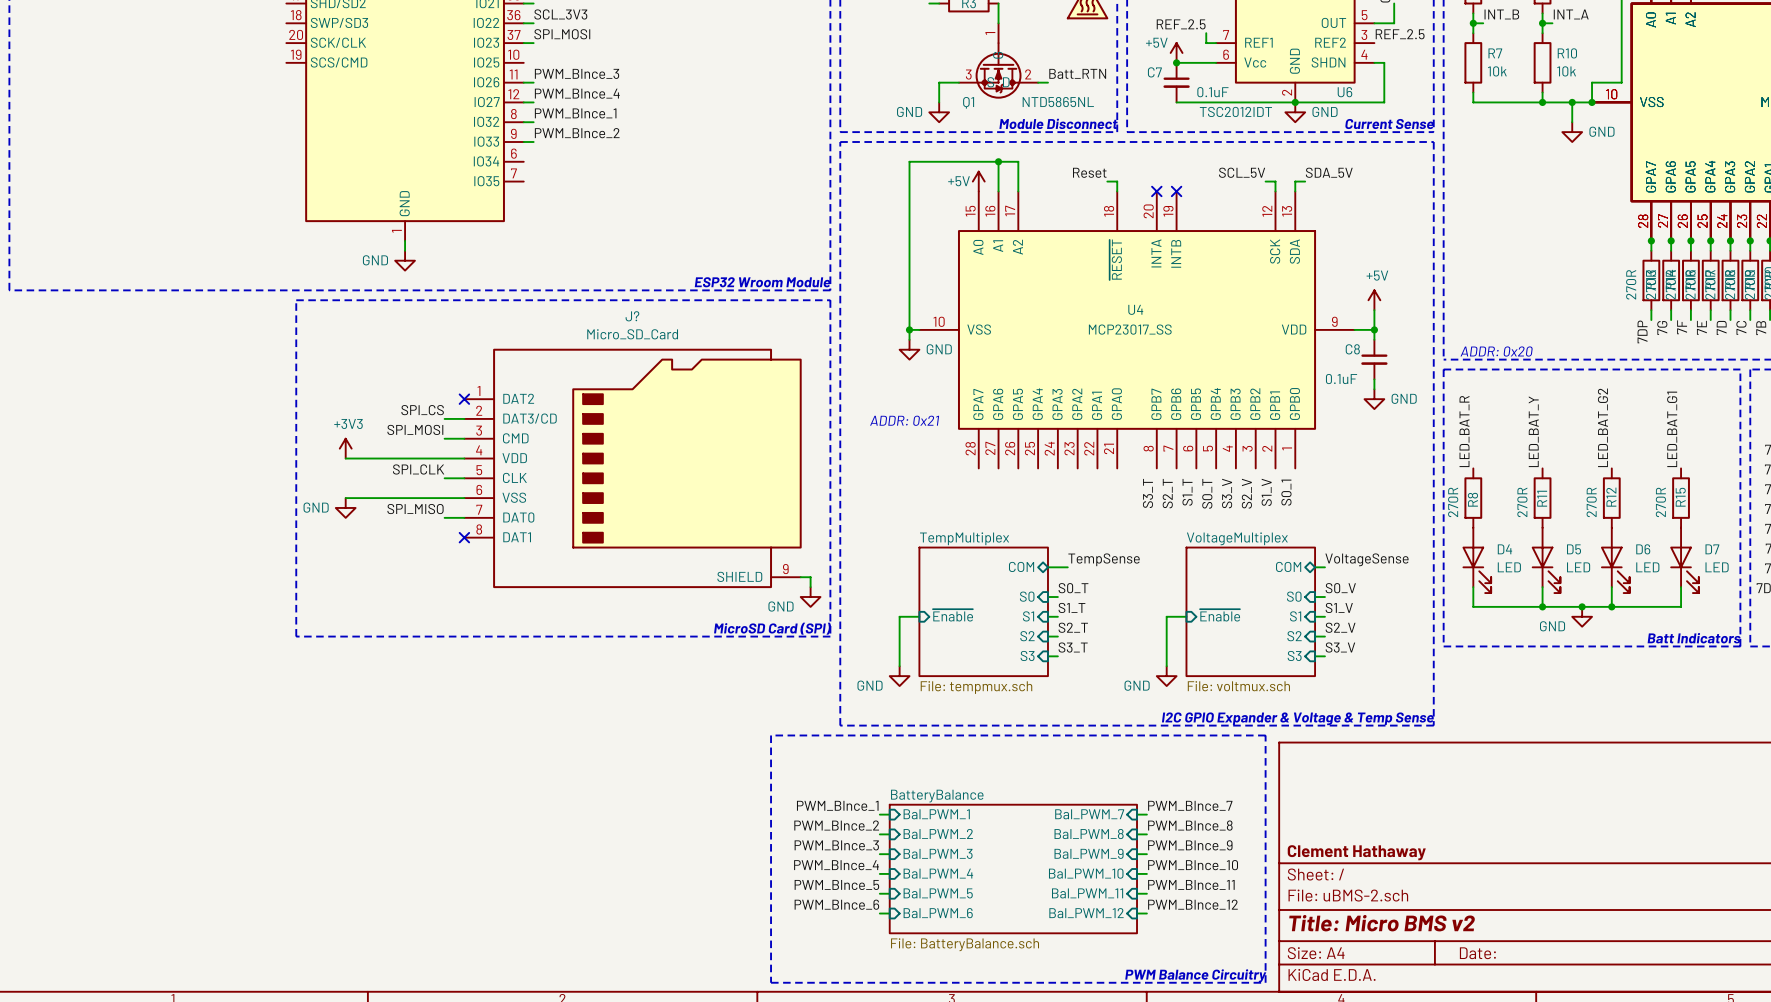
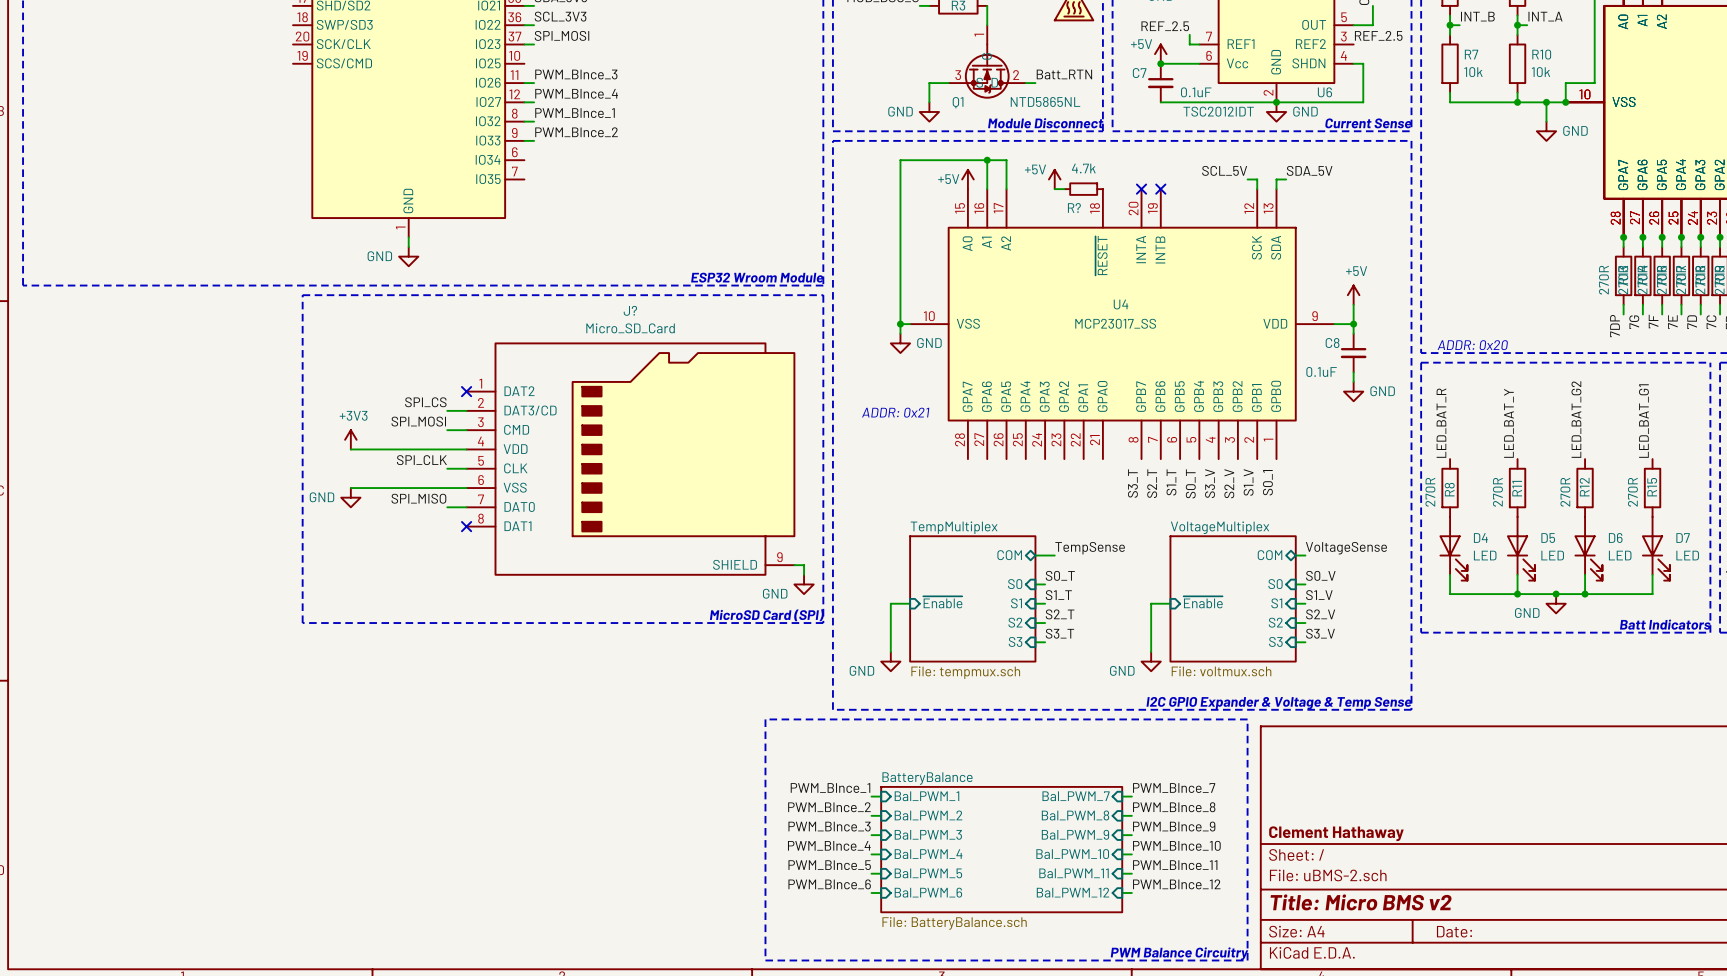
label: Reset (1089, 172) -> none
power symbol: none -> +5V (1054, 179)
wire: (1107, 181) (1117, 181) (1117, 191) -> none
wire: none -> (1054, 189) (1064, 189)
R?: none -> 4.7k (1083, 189)

